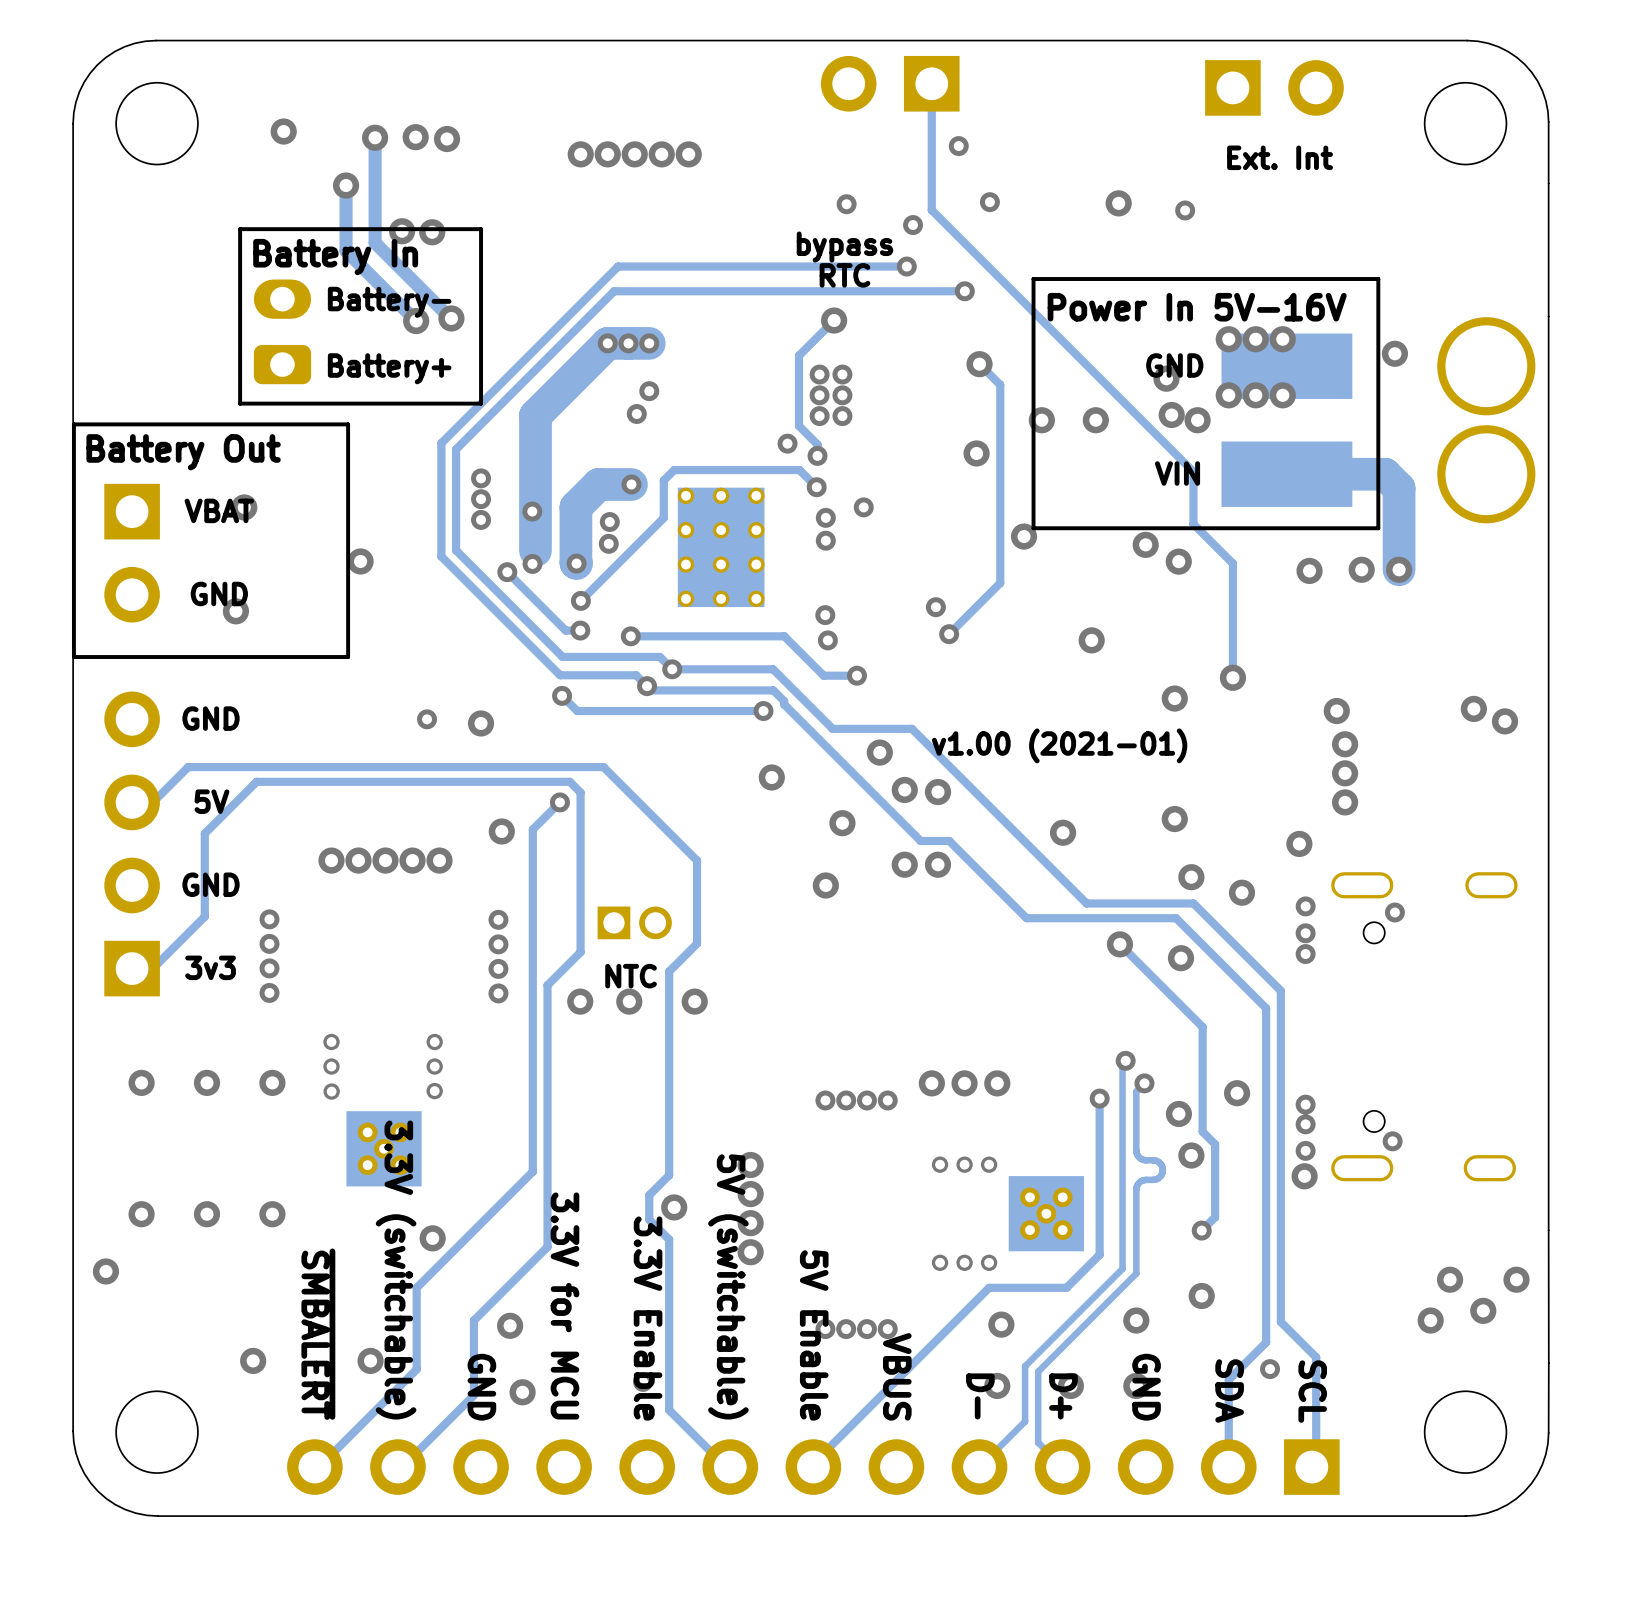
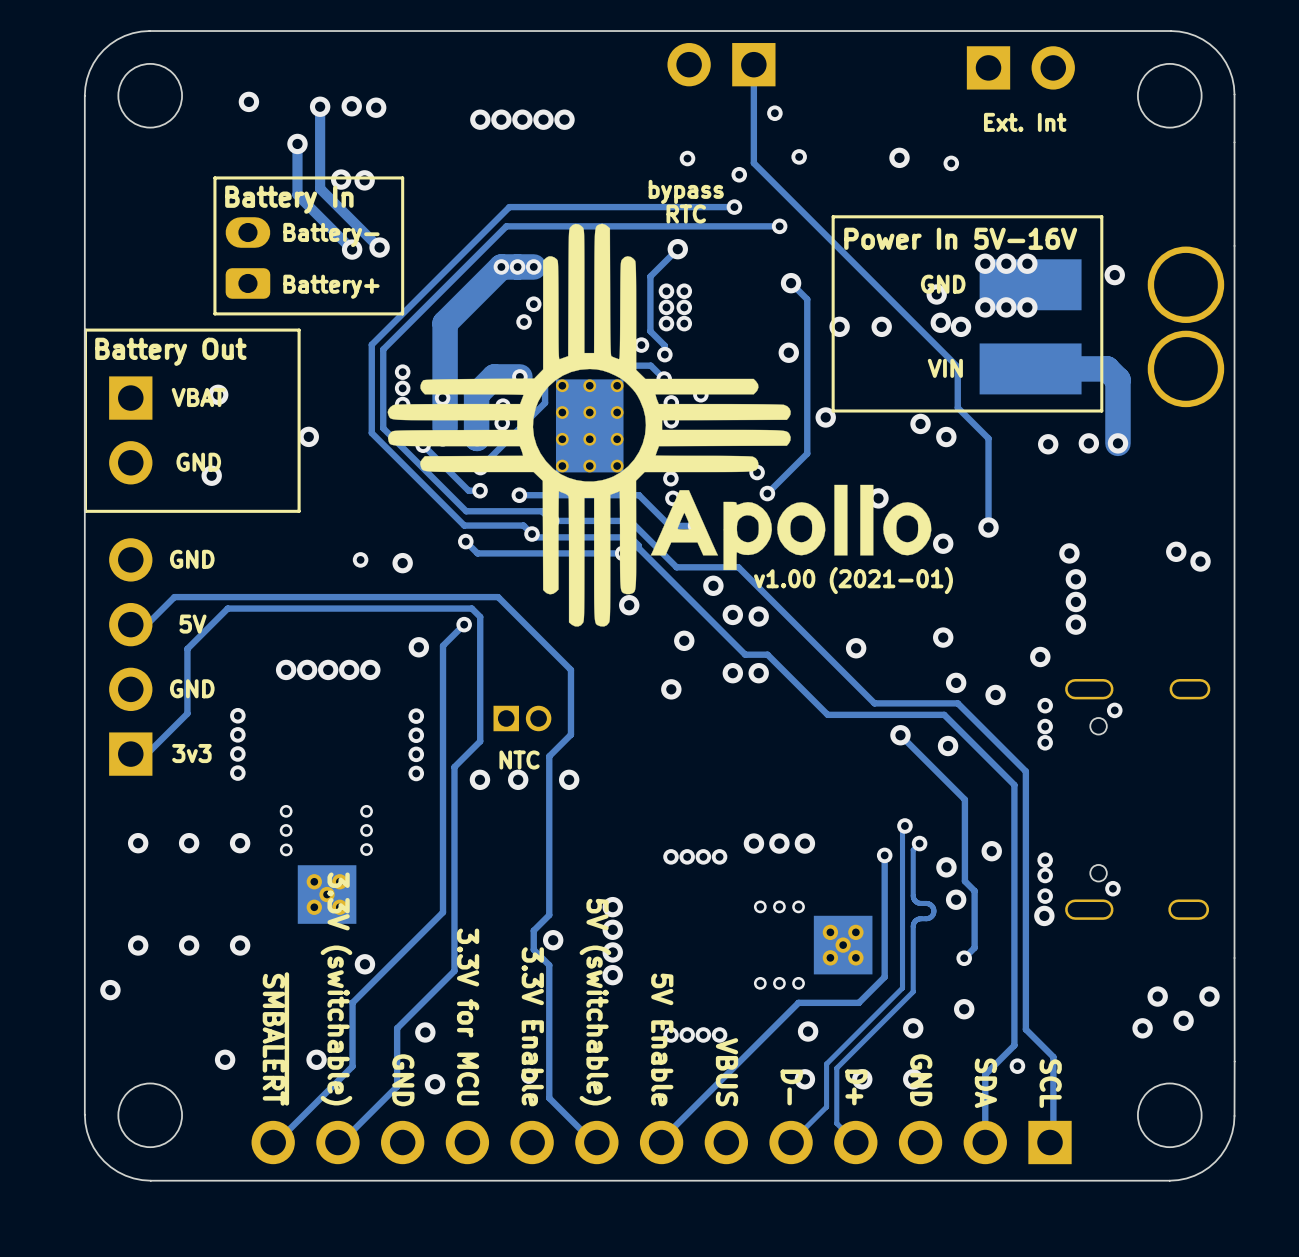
drawing: none -> [387, 223, 932, 627]

